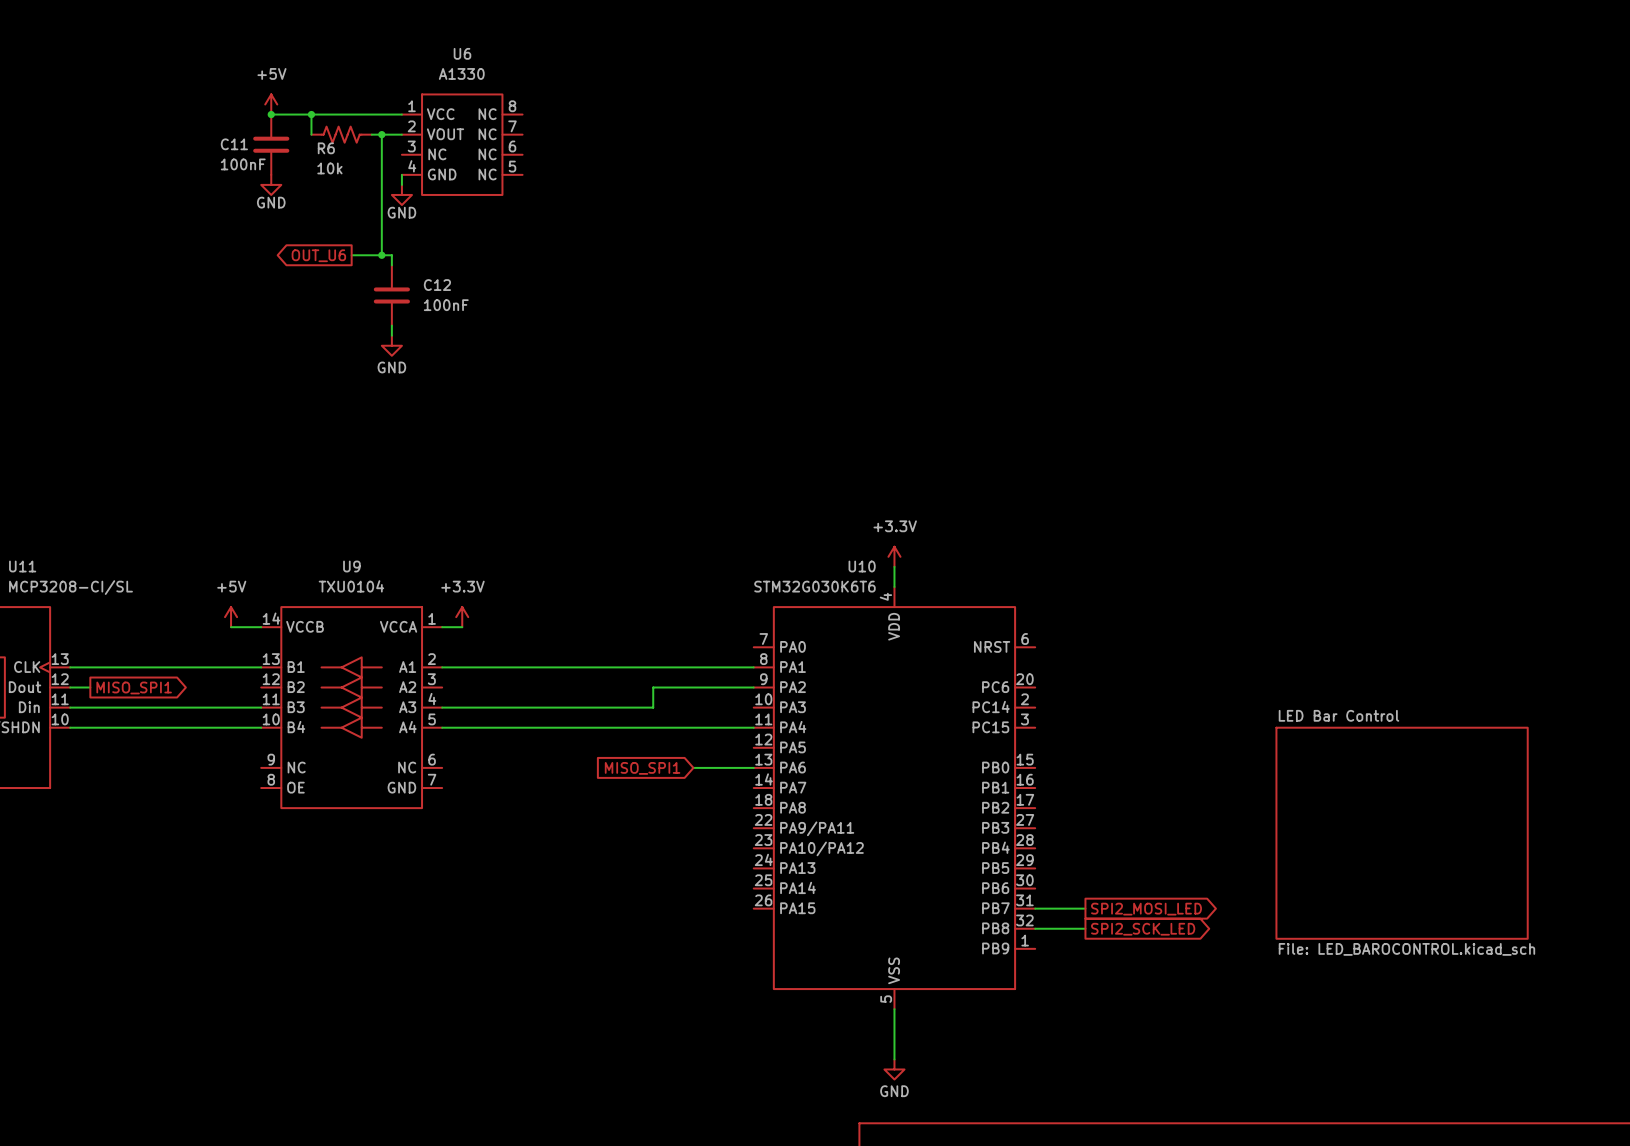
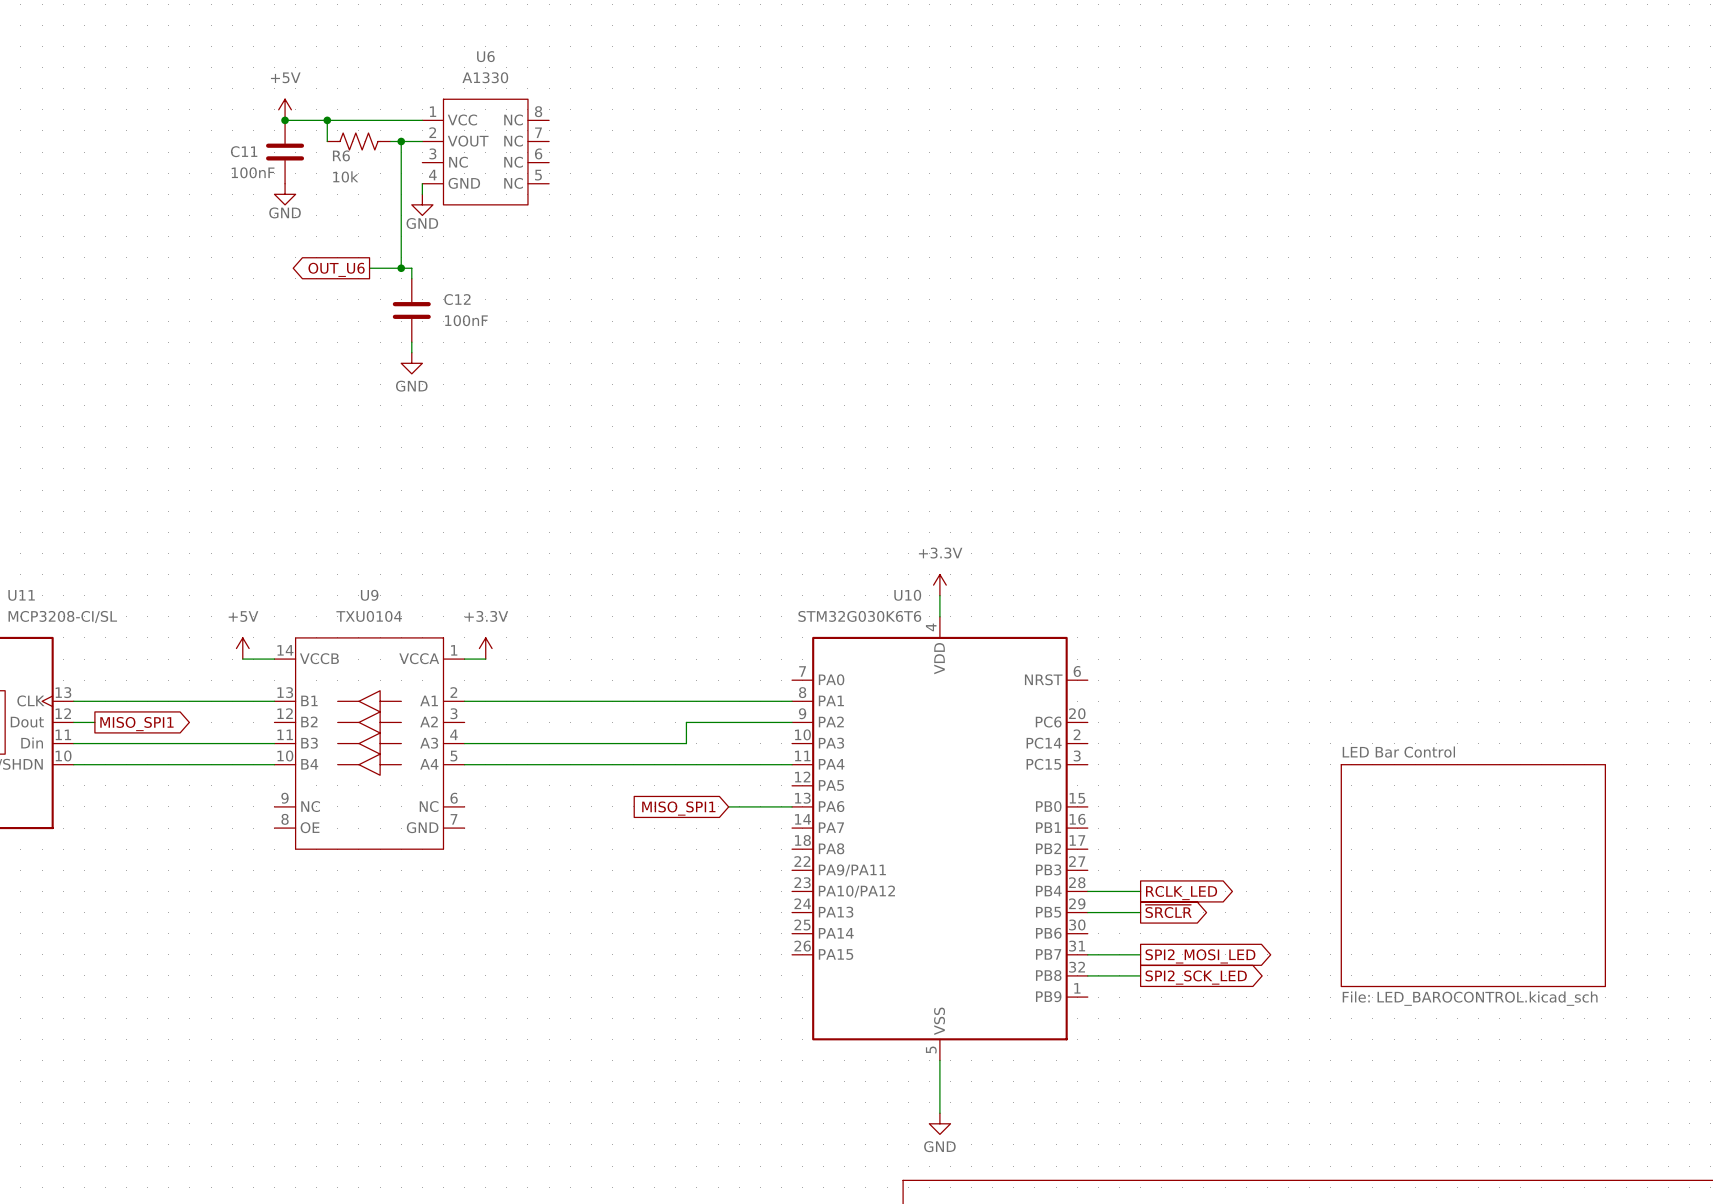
wire: none -> (1087, 891) (1140, 891)
global label: none -> RCLK_LED (1181, 893)
global label: none -> ~{SRCLR} (1168, 911)
wire: none -> (1087, 912) (1140, 912)

